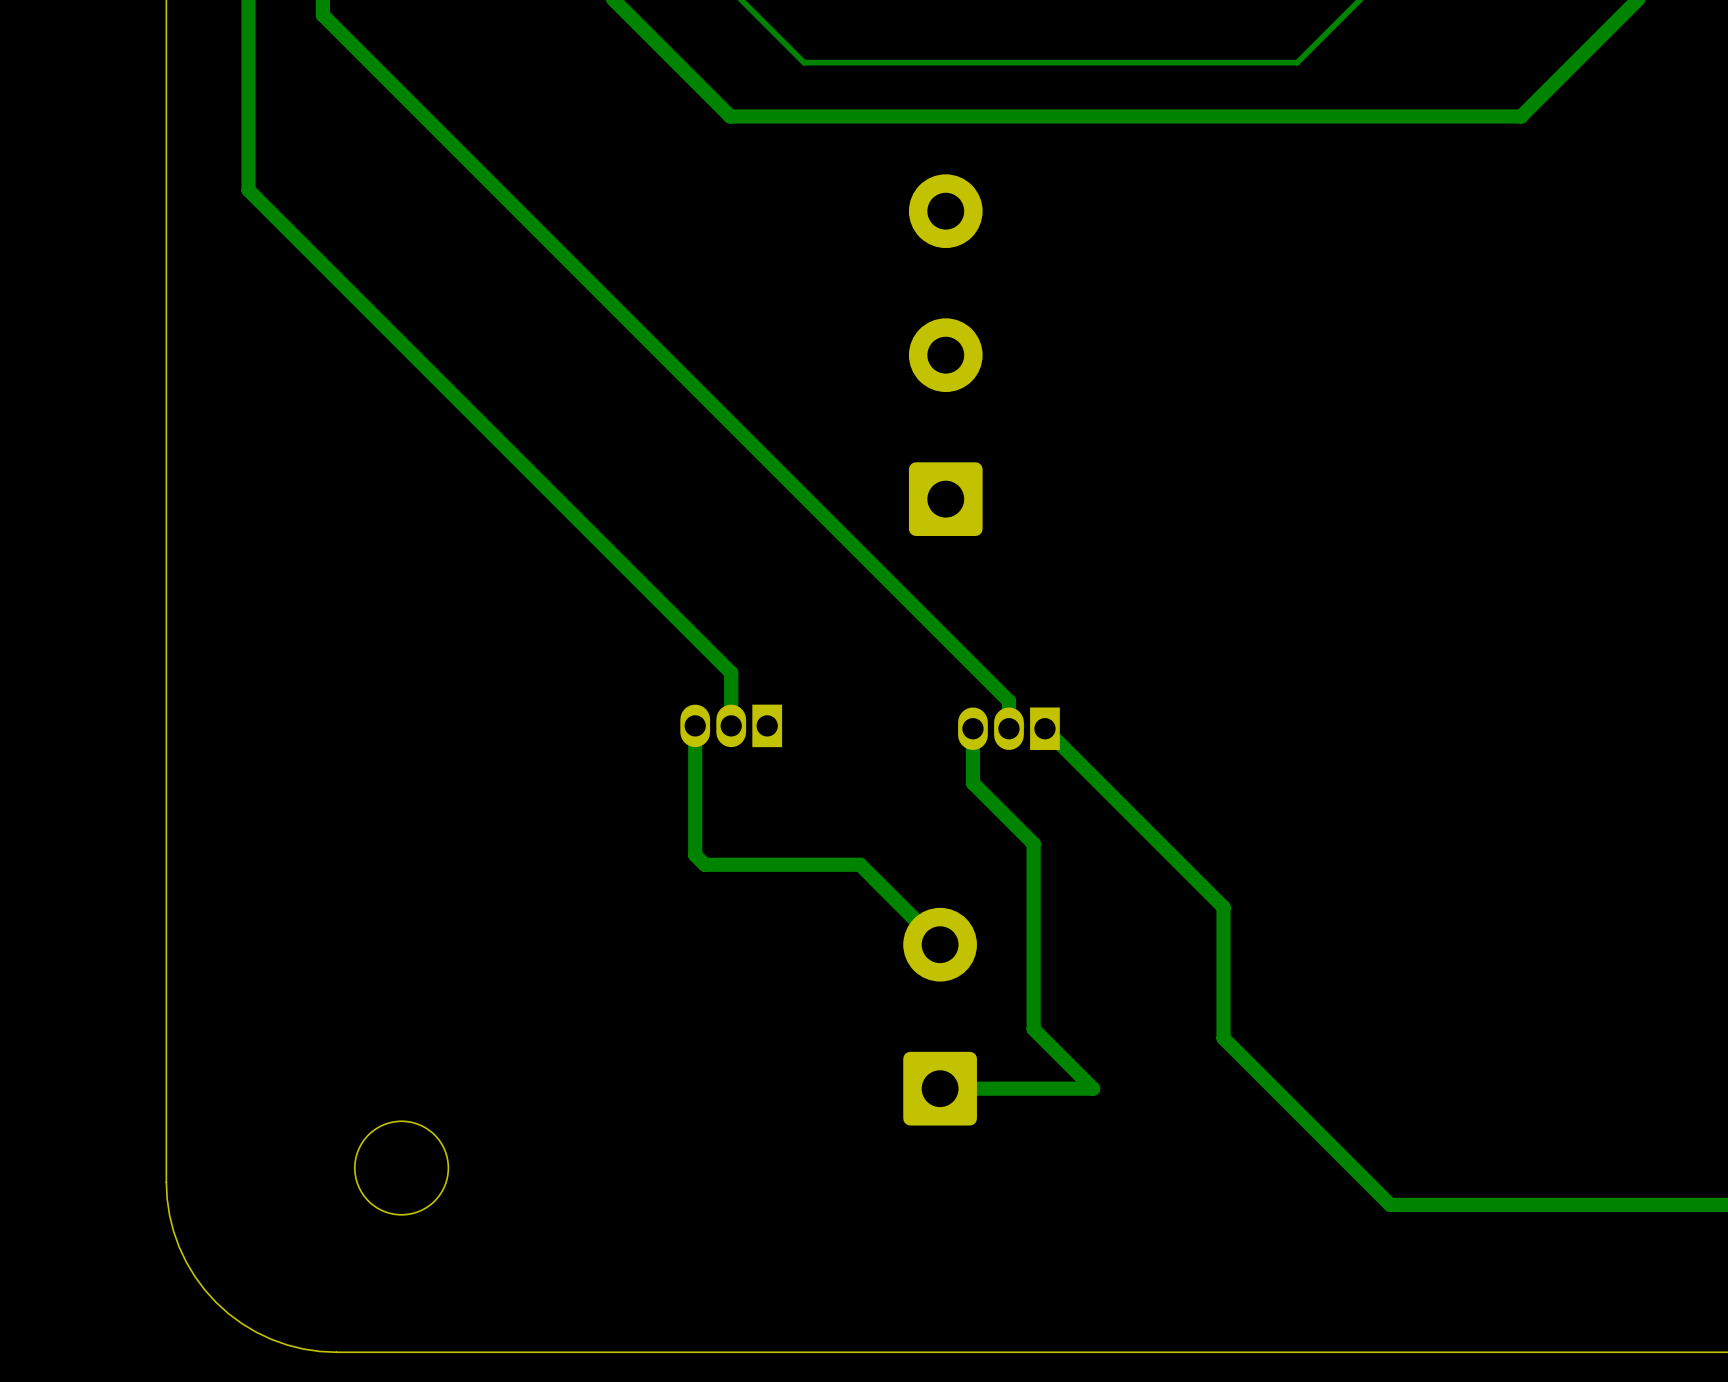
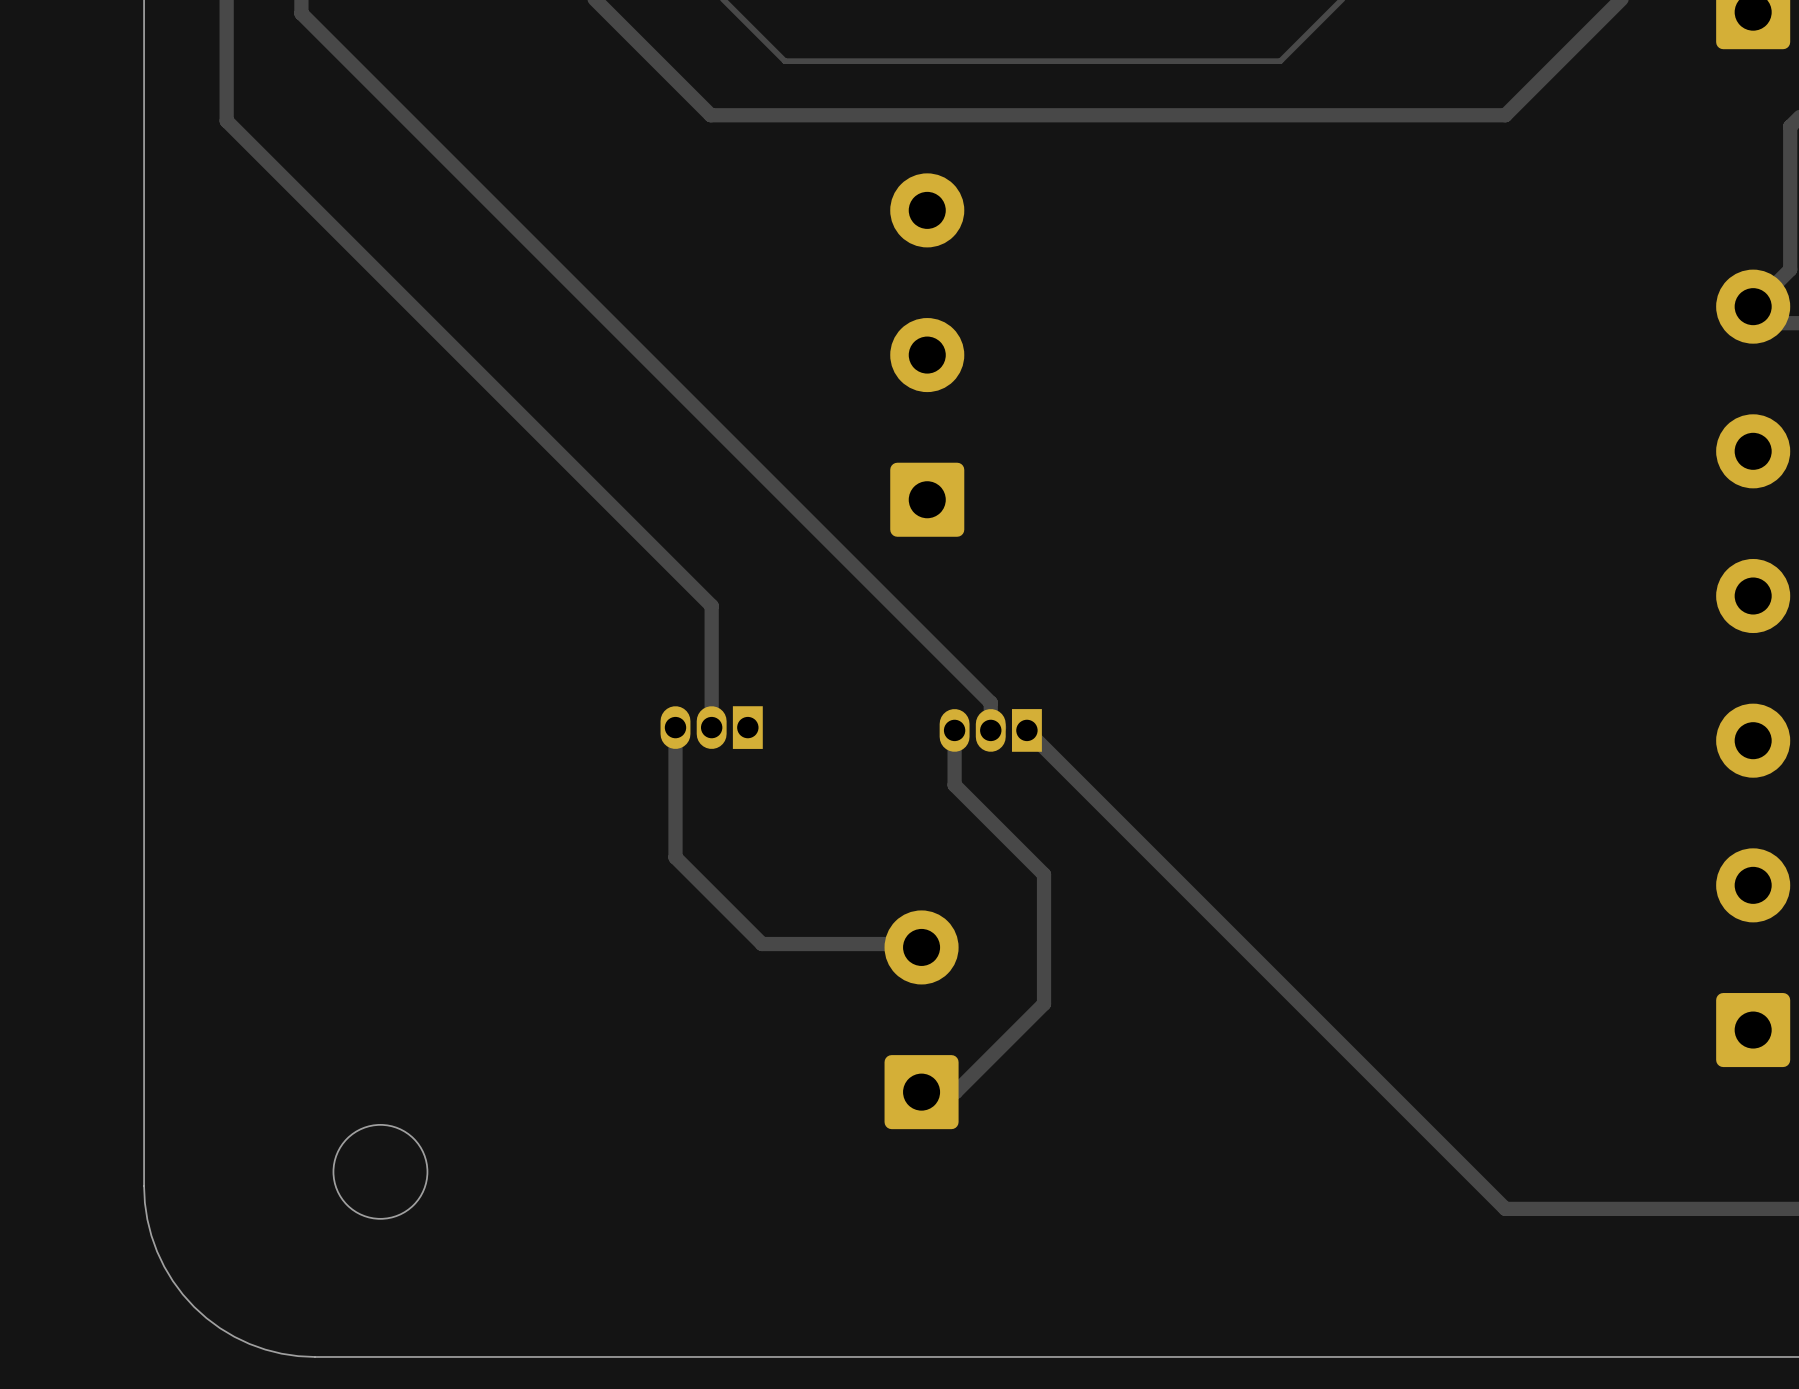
track: (248, 122) (248, 190) (731, 672) -> (226, 120) (711, 605) (711, 674)
track: (1033, 843) (1033, 1029) (1093, 1088) (974, 1088) -> (1015, 846) (1044, 874) (1044, 1003) (955, 1092)
track: (704, 864) (860, 864) (936, 941) -> (685, 867) (762, 944) (918, 944)
track: (1223, 907) (1223, 1038) (1390, 1204) (1521, 1204) -> (1206, 909) (1505, 1208)

